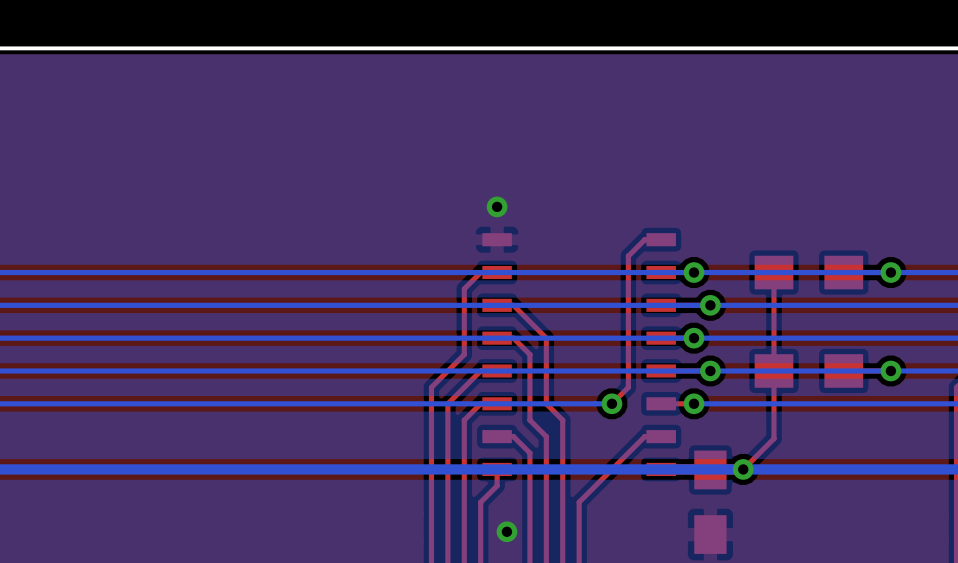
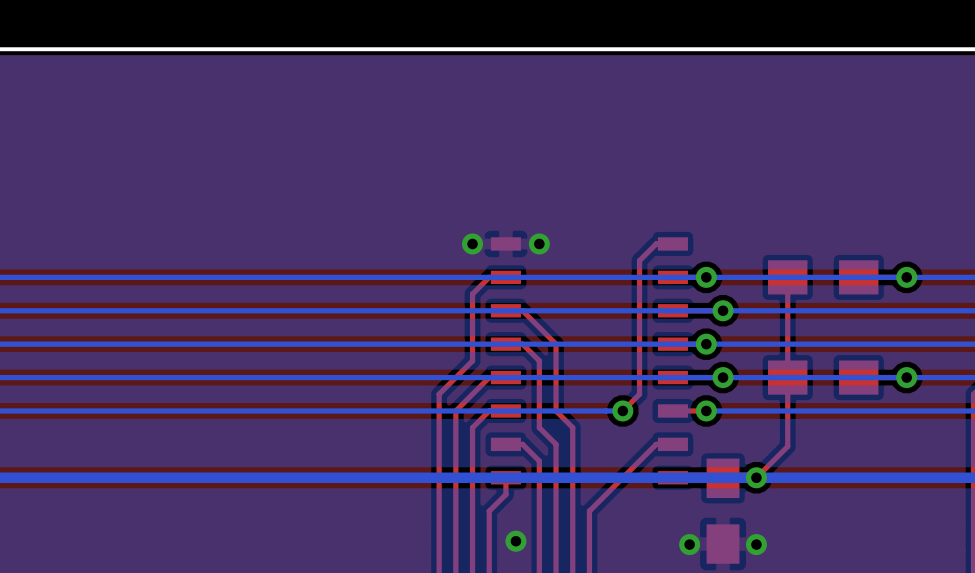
via: (497, 206) -> none
via: none -> (472, 243)
via: none -> (539, 243)
via: none -> (689, 544)
via: none -> (756, 544)

